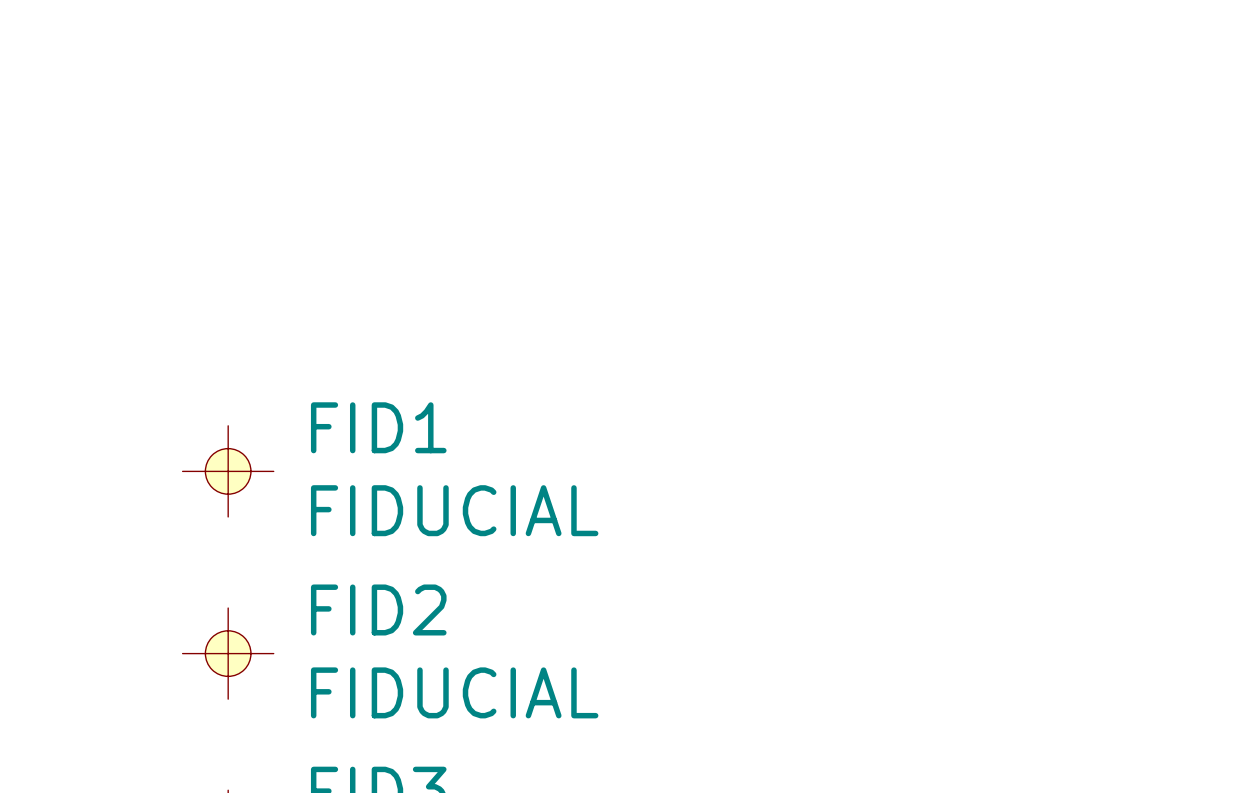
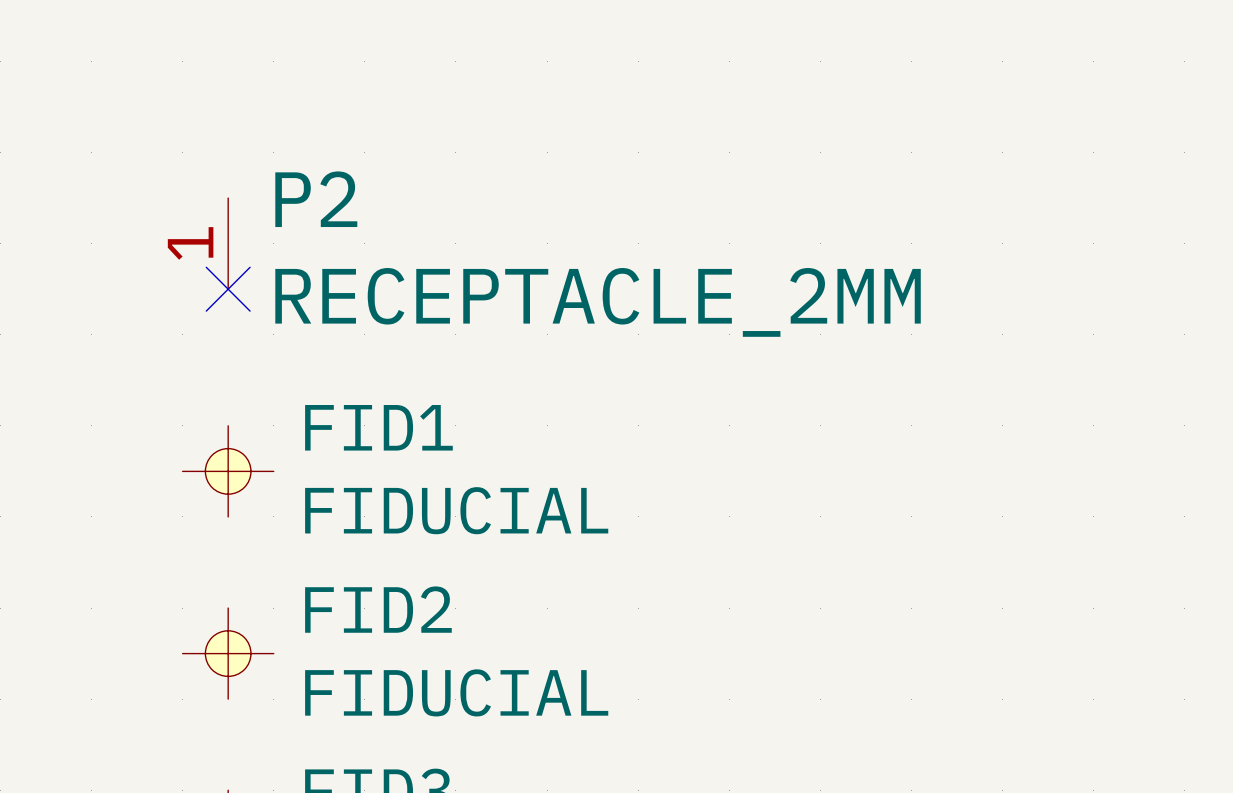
P2: none -> RECEPTACLE_2MM (228, 243)
no-connect mark: none -> (228, 289)

